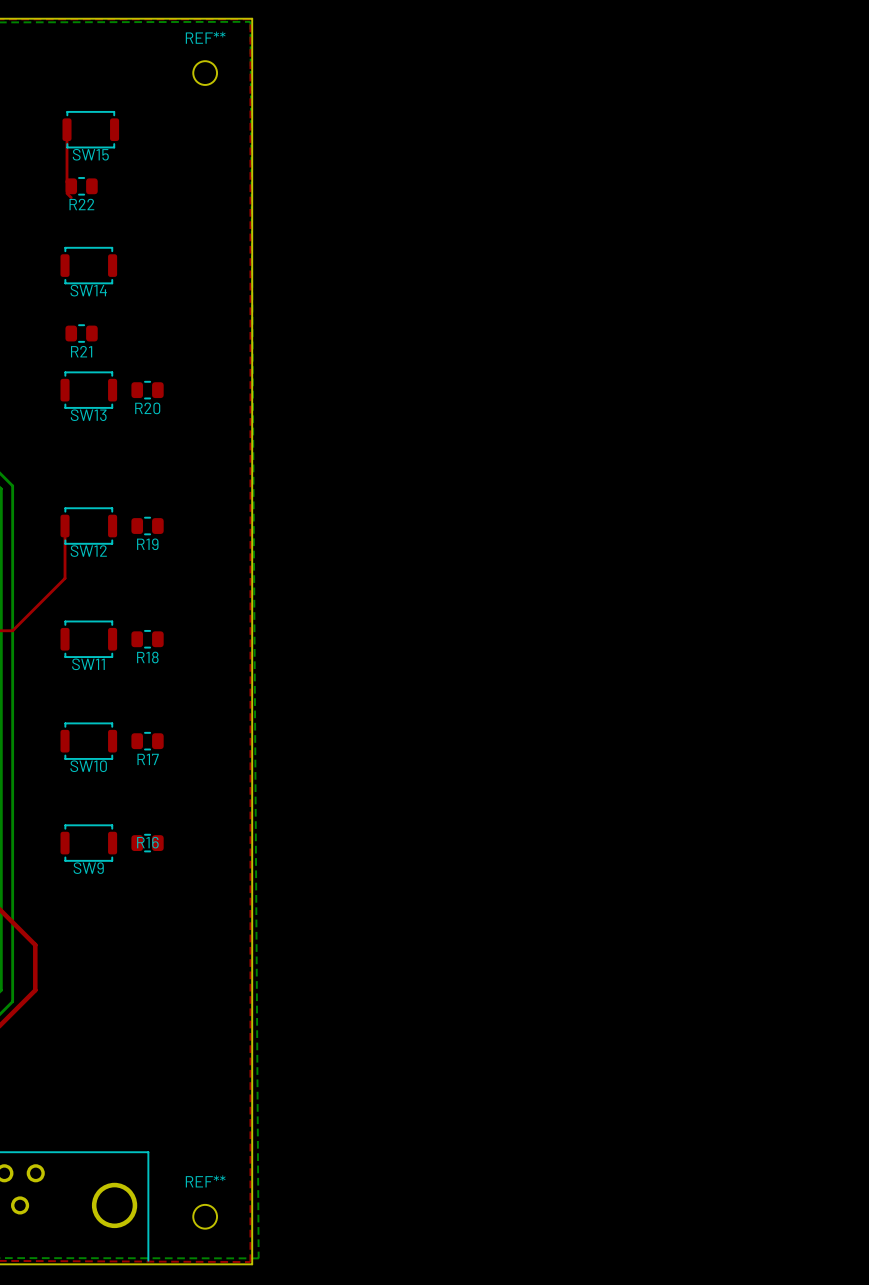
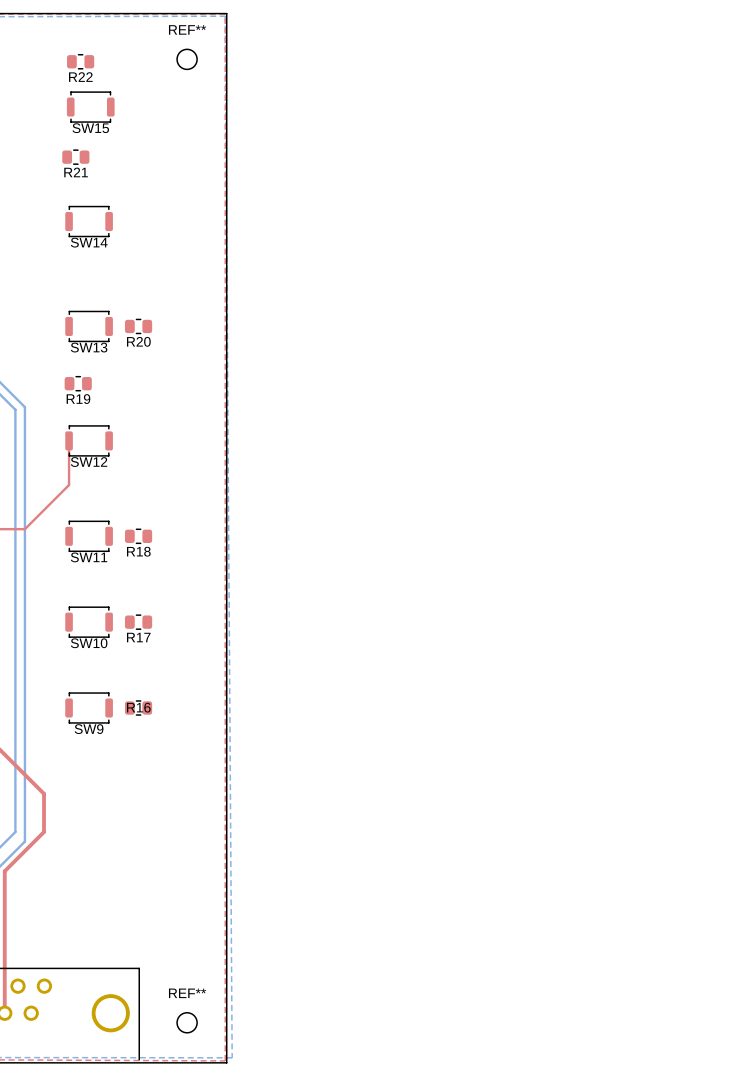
top track: (67, 129) (67, 182) (71, 186) -> none
R22 position: (81, 186) -> (80, 61)
top track: (67, 193) (71, 197) -> none
R21 position: (81, 333) -> (75, 157)
R19 position: (147, 526) -> (78, 383)

